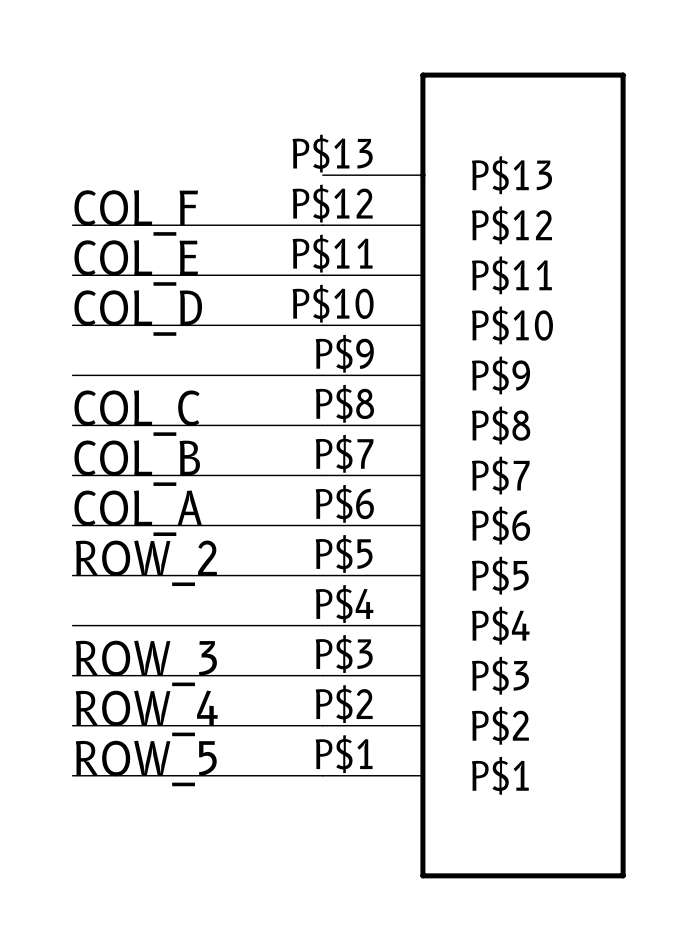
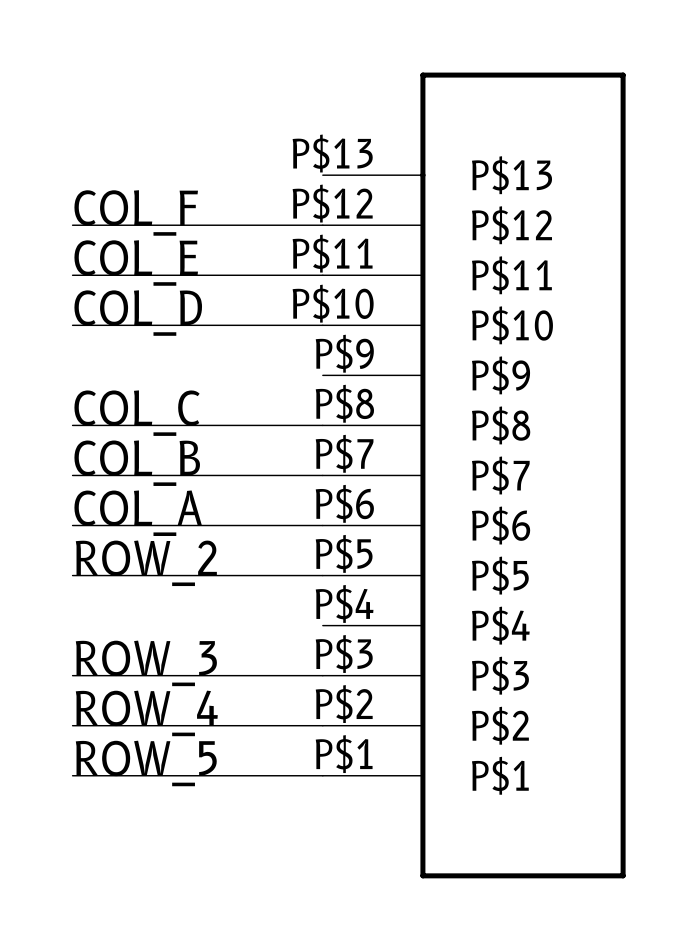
wire: (72, 375) (322, 375) -> none
wire: (72, 625) (322, 625) -> none

